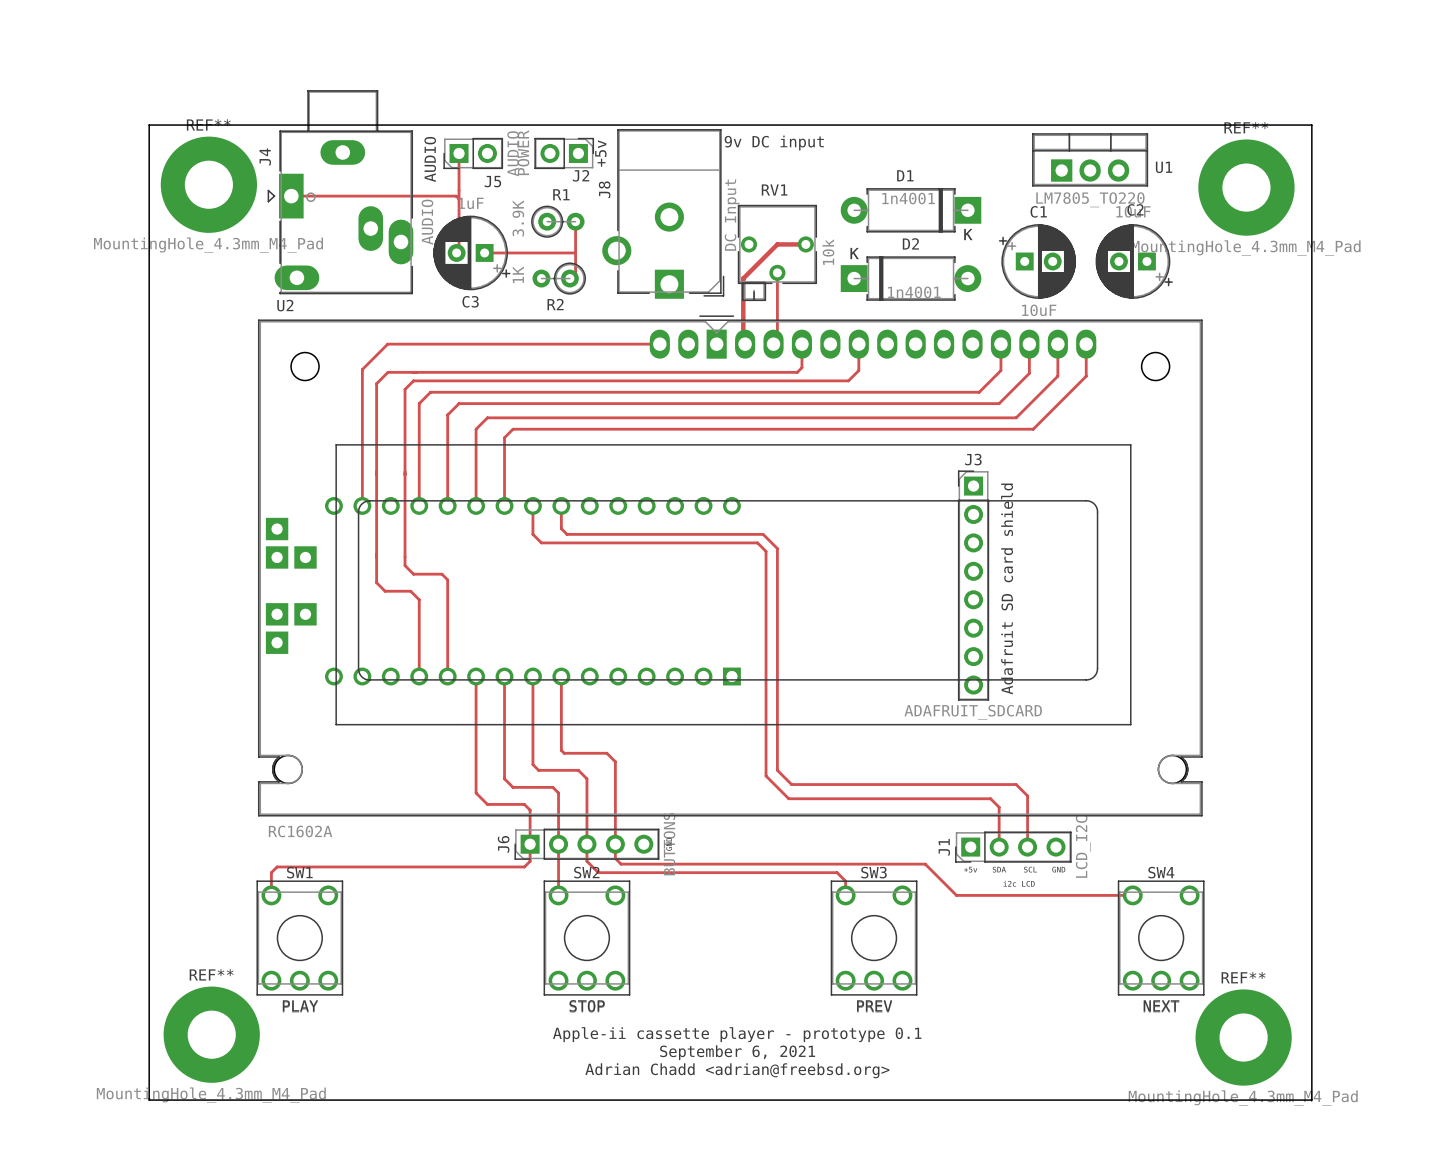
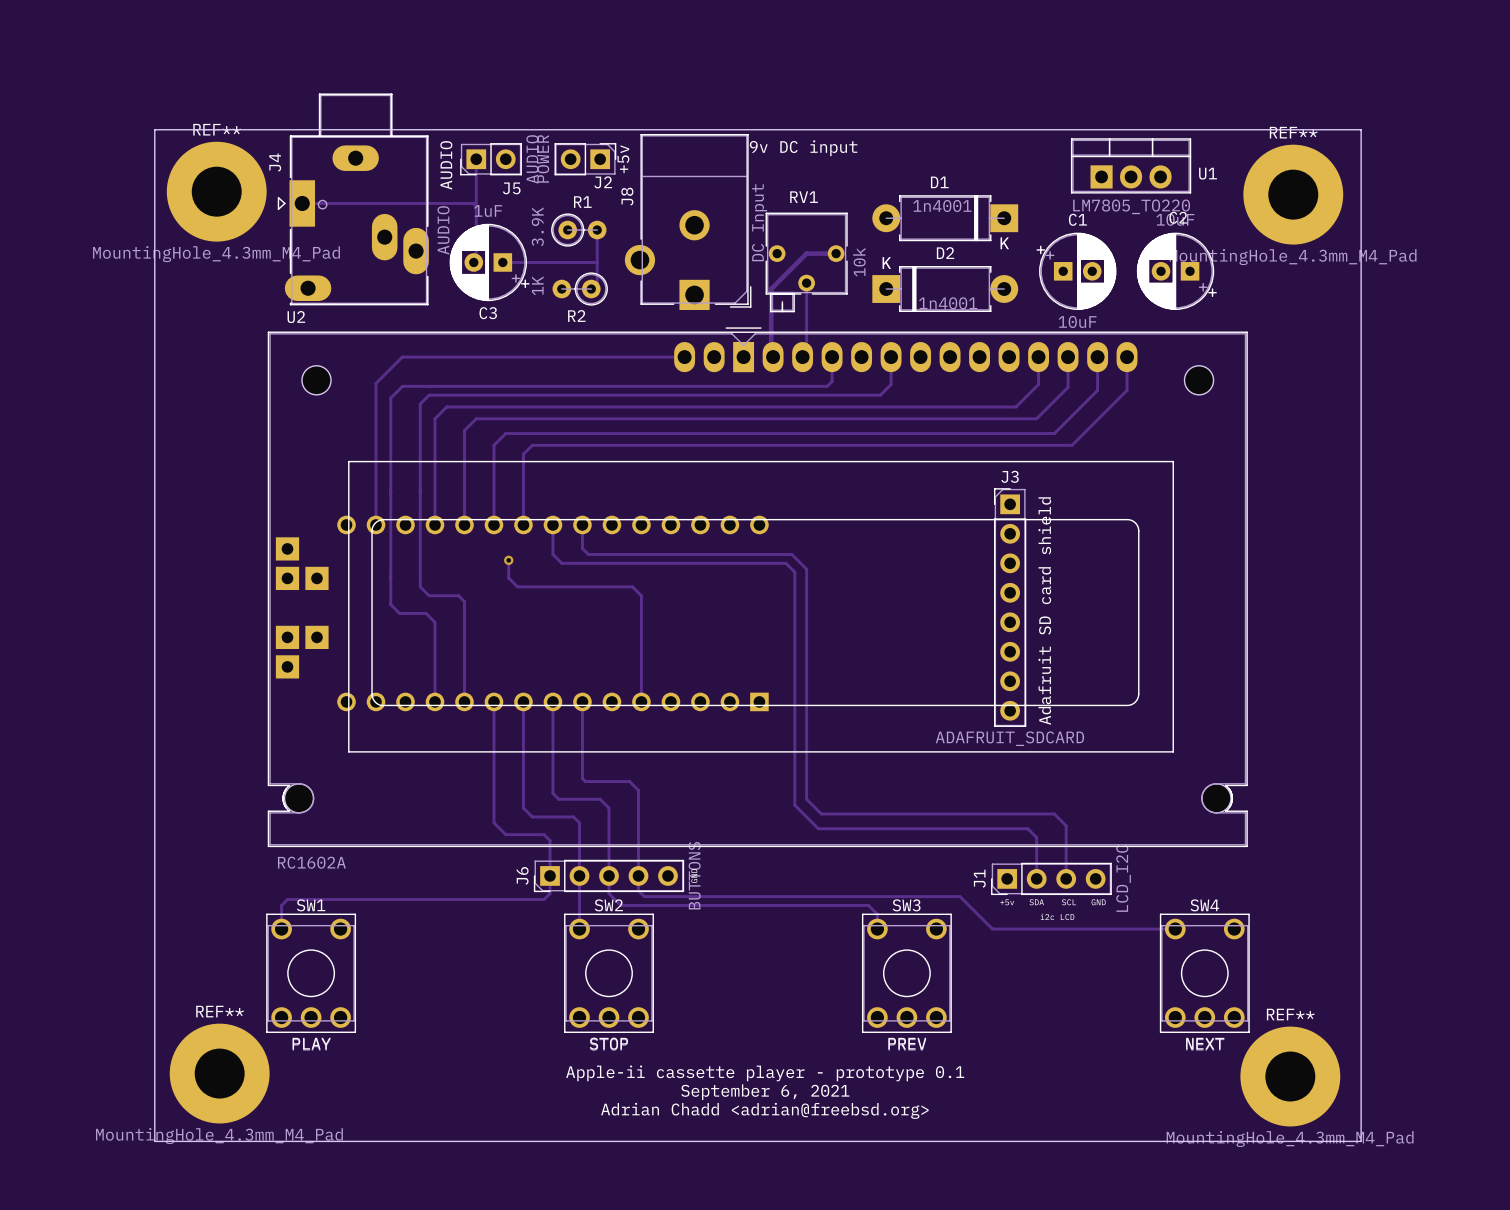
track: none -> (508, 560) (508, 578) (517, 586) (632, 586) (641, 595) (641, 701)
via: none -> (508, 560)

